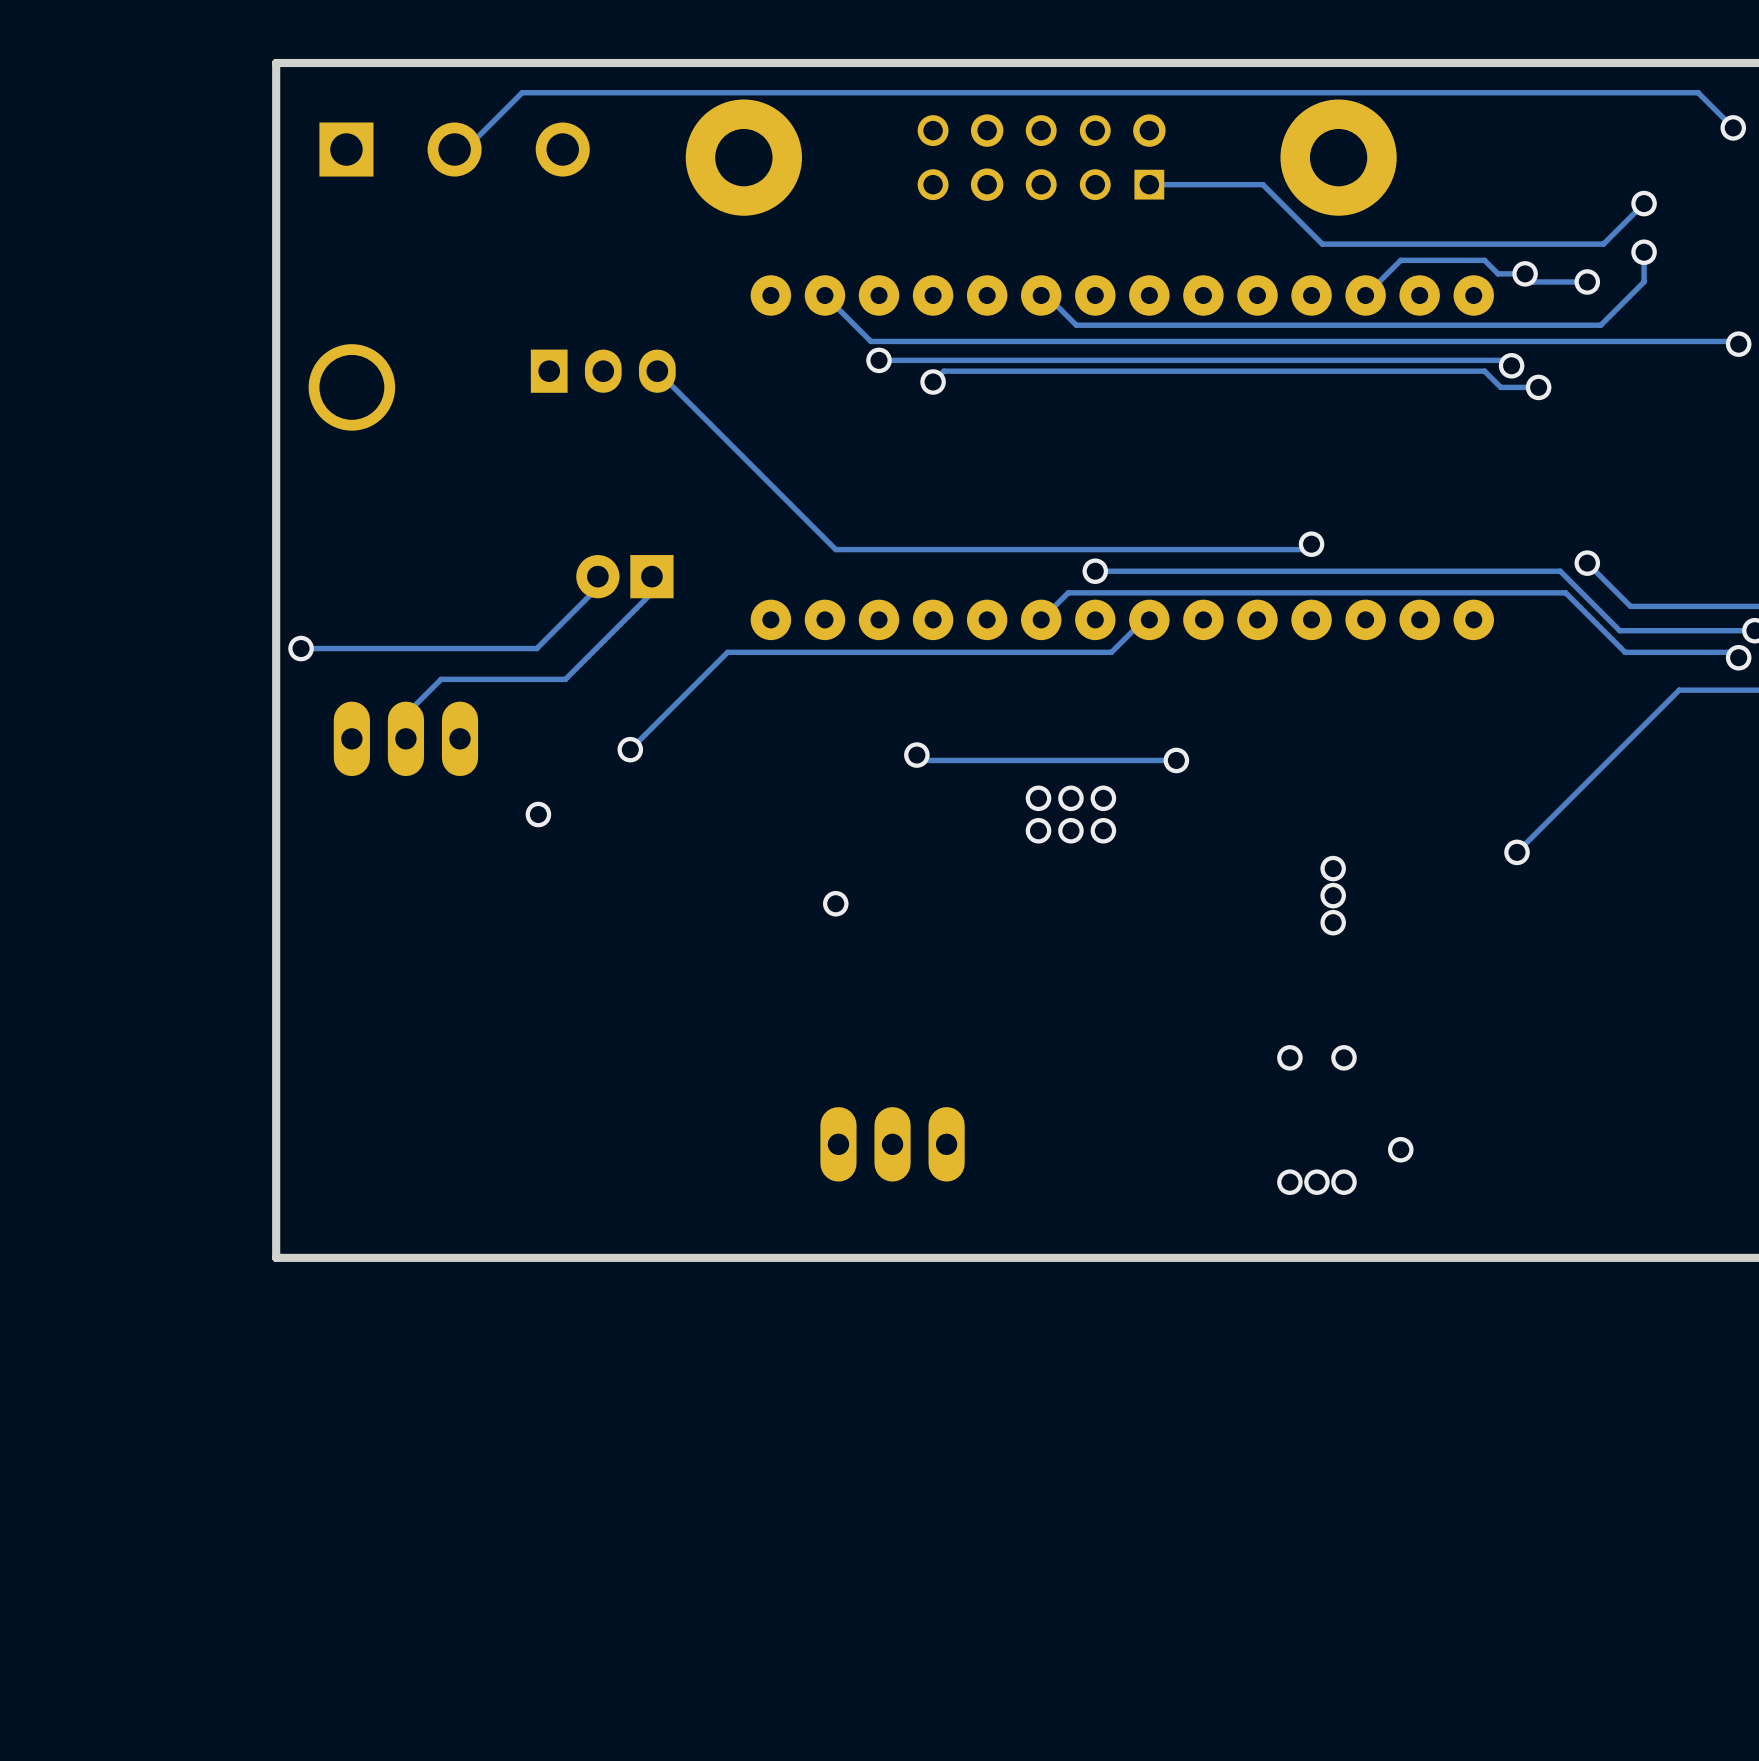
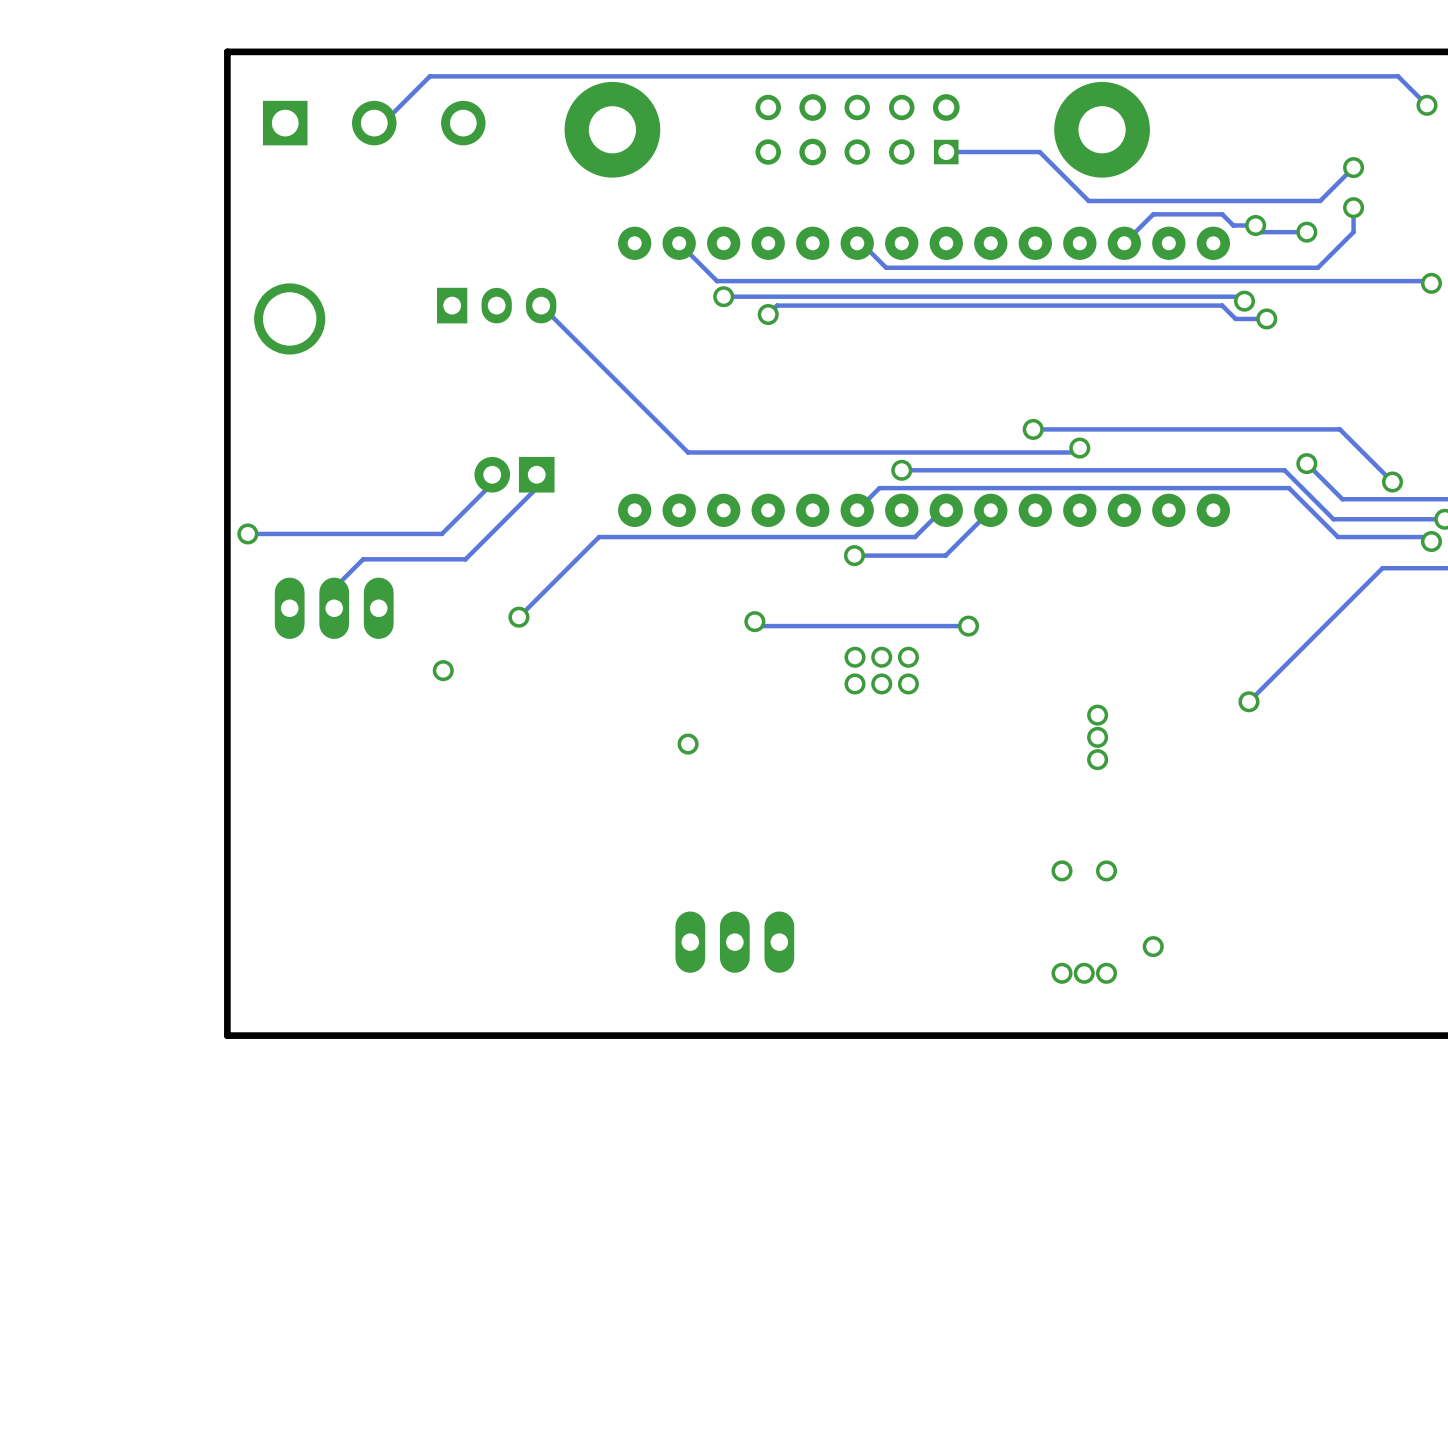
track: none -> (1033, 429) (1339, 429) (1392, 482)
via: none -> (1033, 429)
via: none -> (1392, 482)
track: none -> (990, 510) (945, 555) (854, 555)
via: none -> (854, 555)

